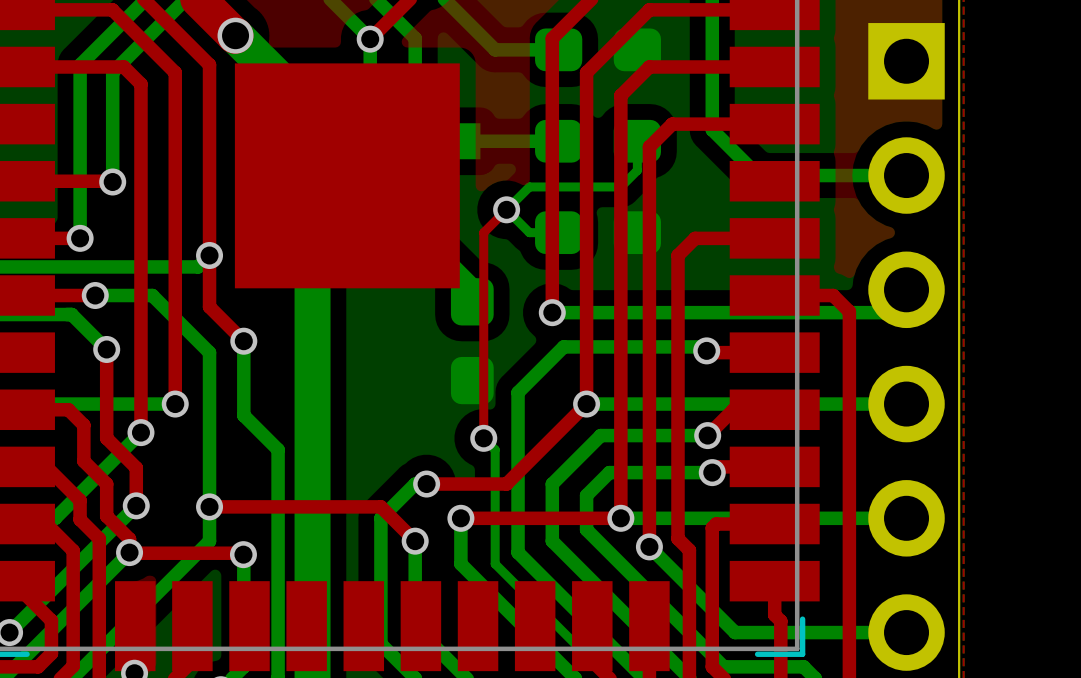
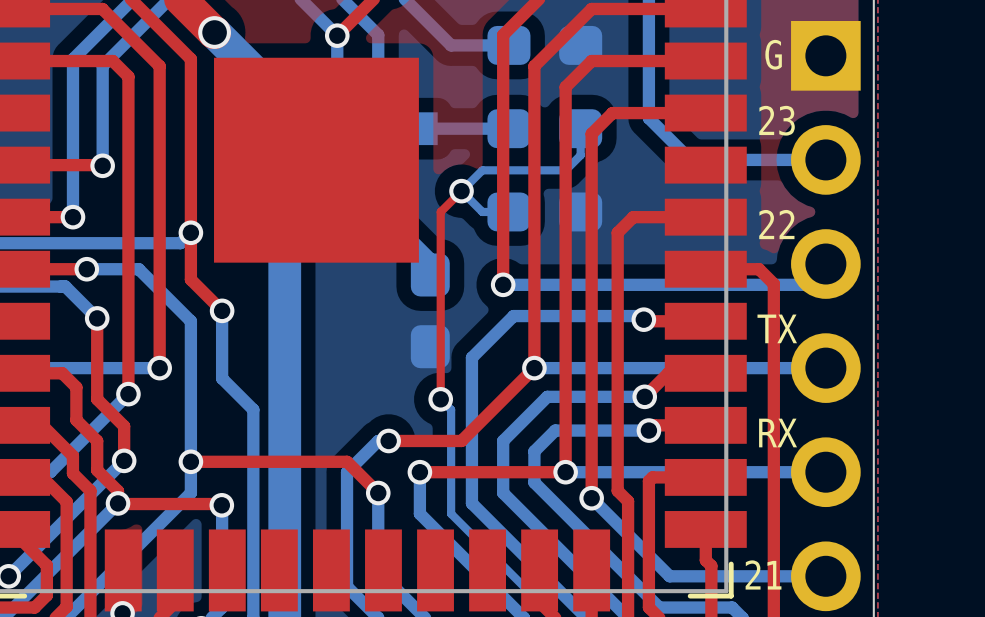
text: none -> G (773, 54)
text: none -> 23 (777, 120)
text: none -> 22 (776, 224)
text: none -> TX (777, 328)
text: none -> RX (778, 432)
text: none -> 21 (763, 574)

